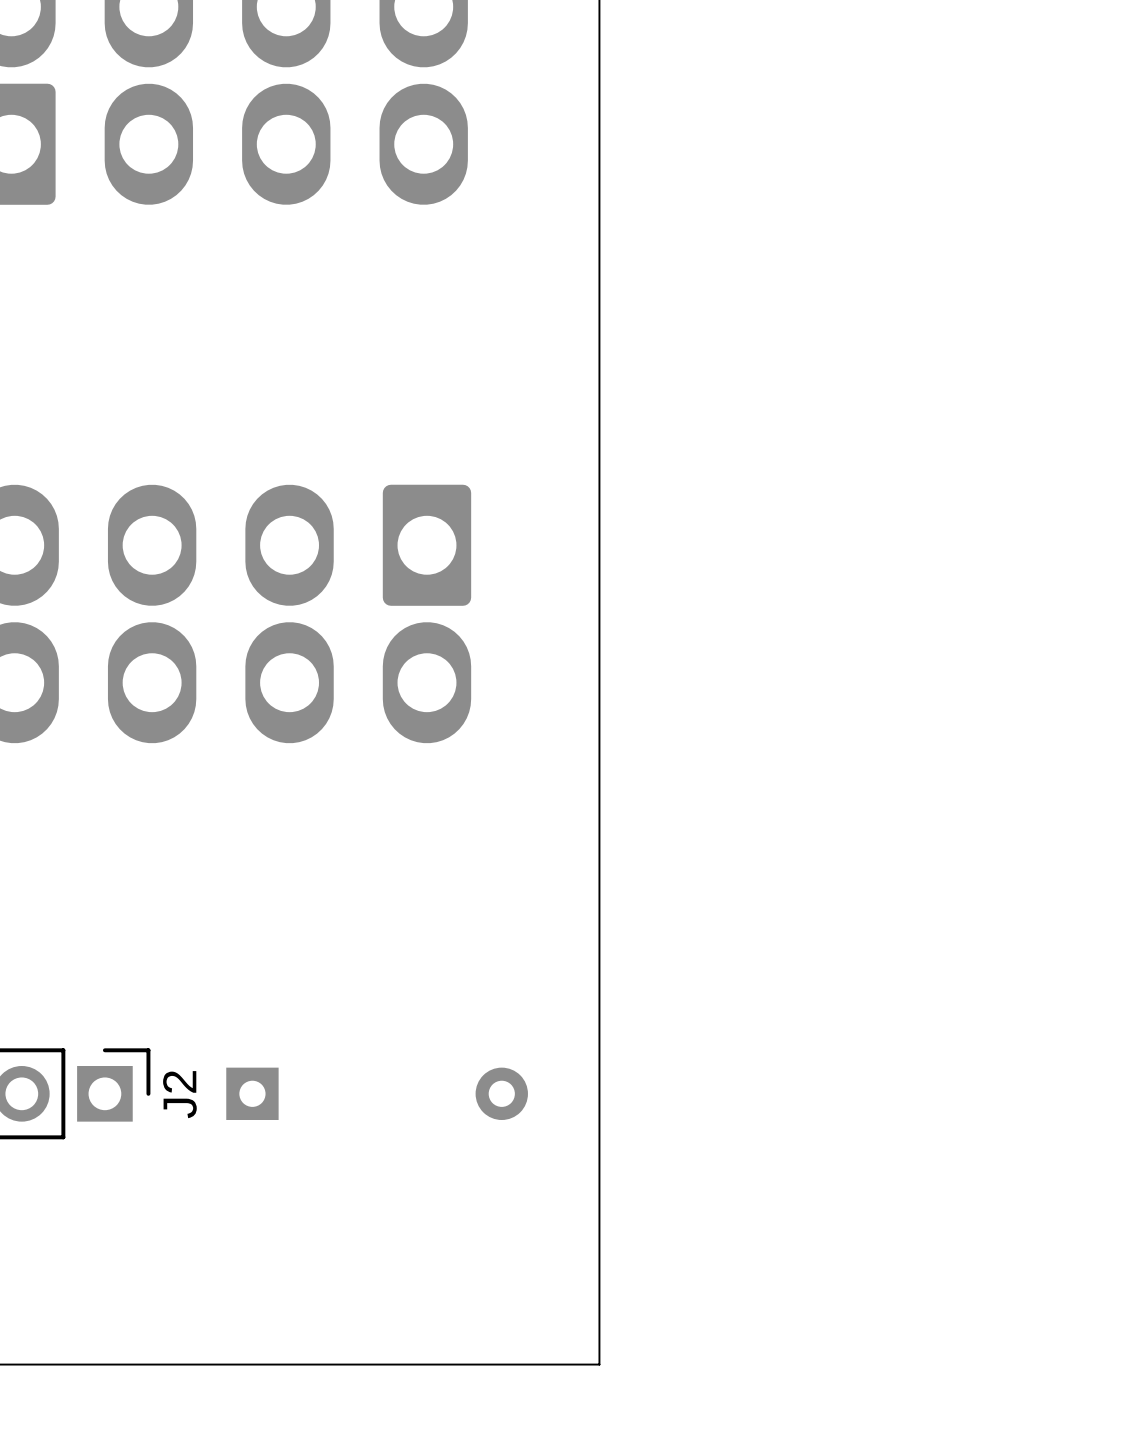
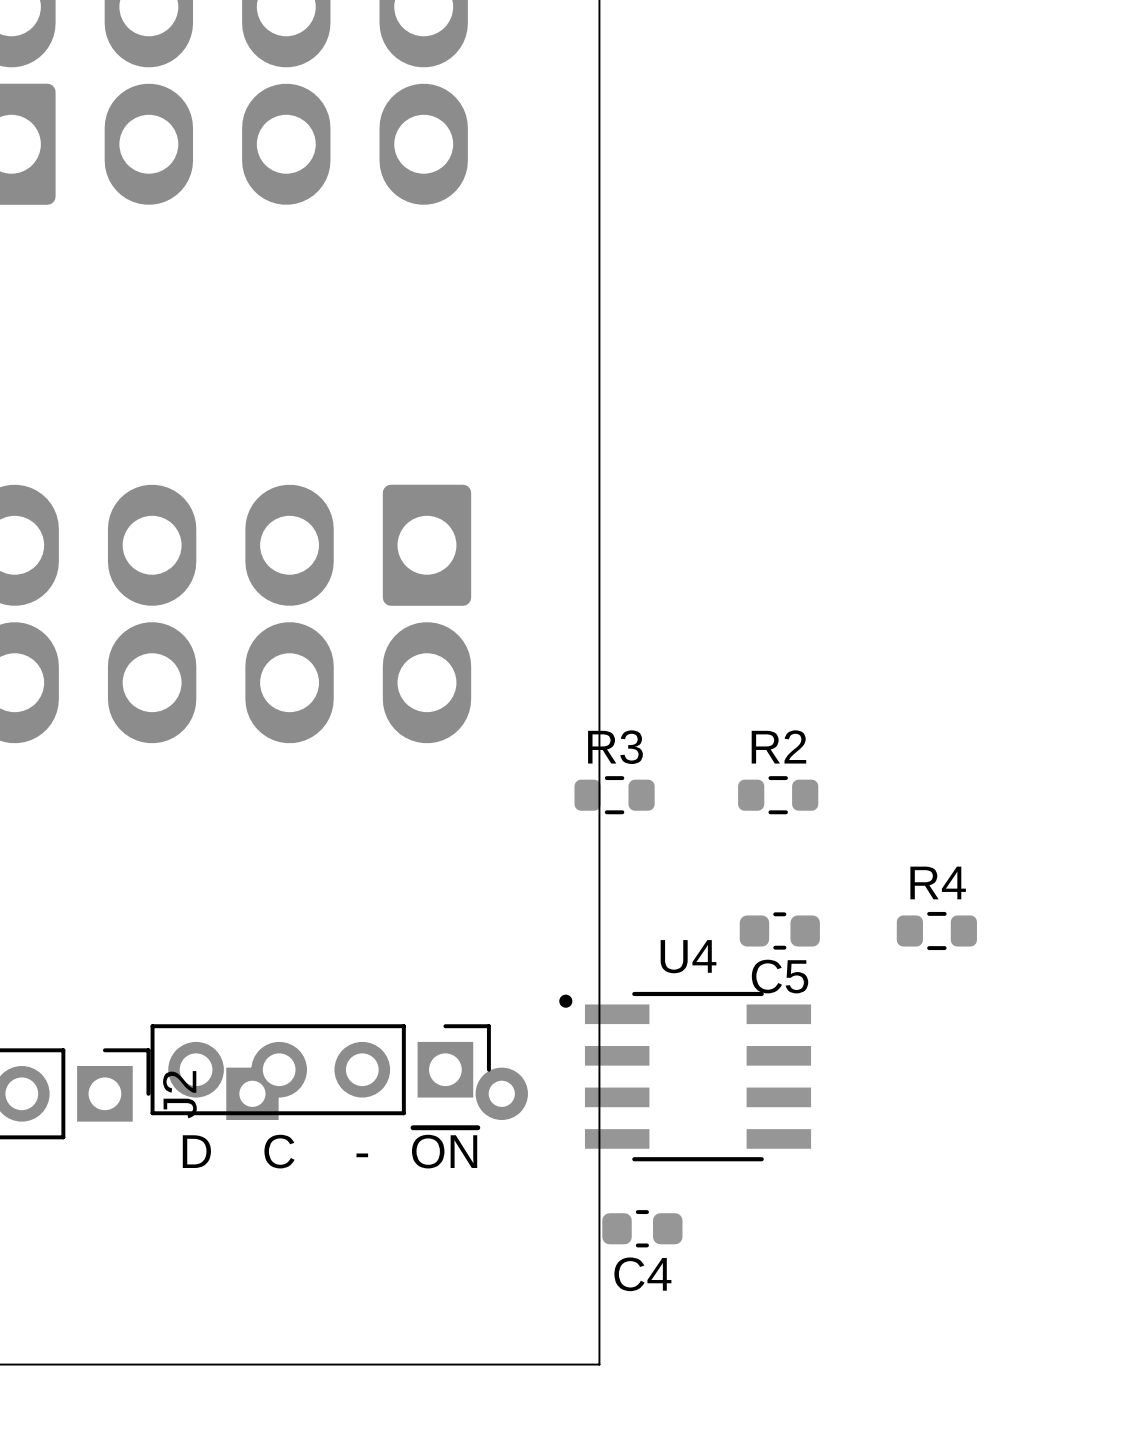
R3: none -> (614, 795)
R2: none -> (778, 795)
C5: none -> (779, 930)
R4: none -> (936, 930)
part: none -> (320, 1069)
U4: none -> (685, 1076)
text: none -> ~{ON} (444, 1148)
text: none -> D (196, 1151)
text: none -> C (279, 1151)
text: none -> - (362, 1155)
C4: none -> (642, 1228)

